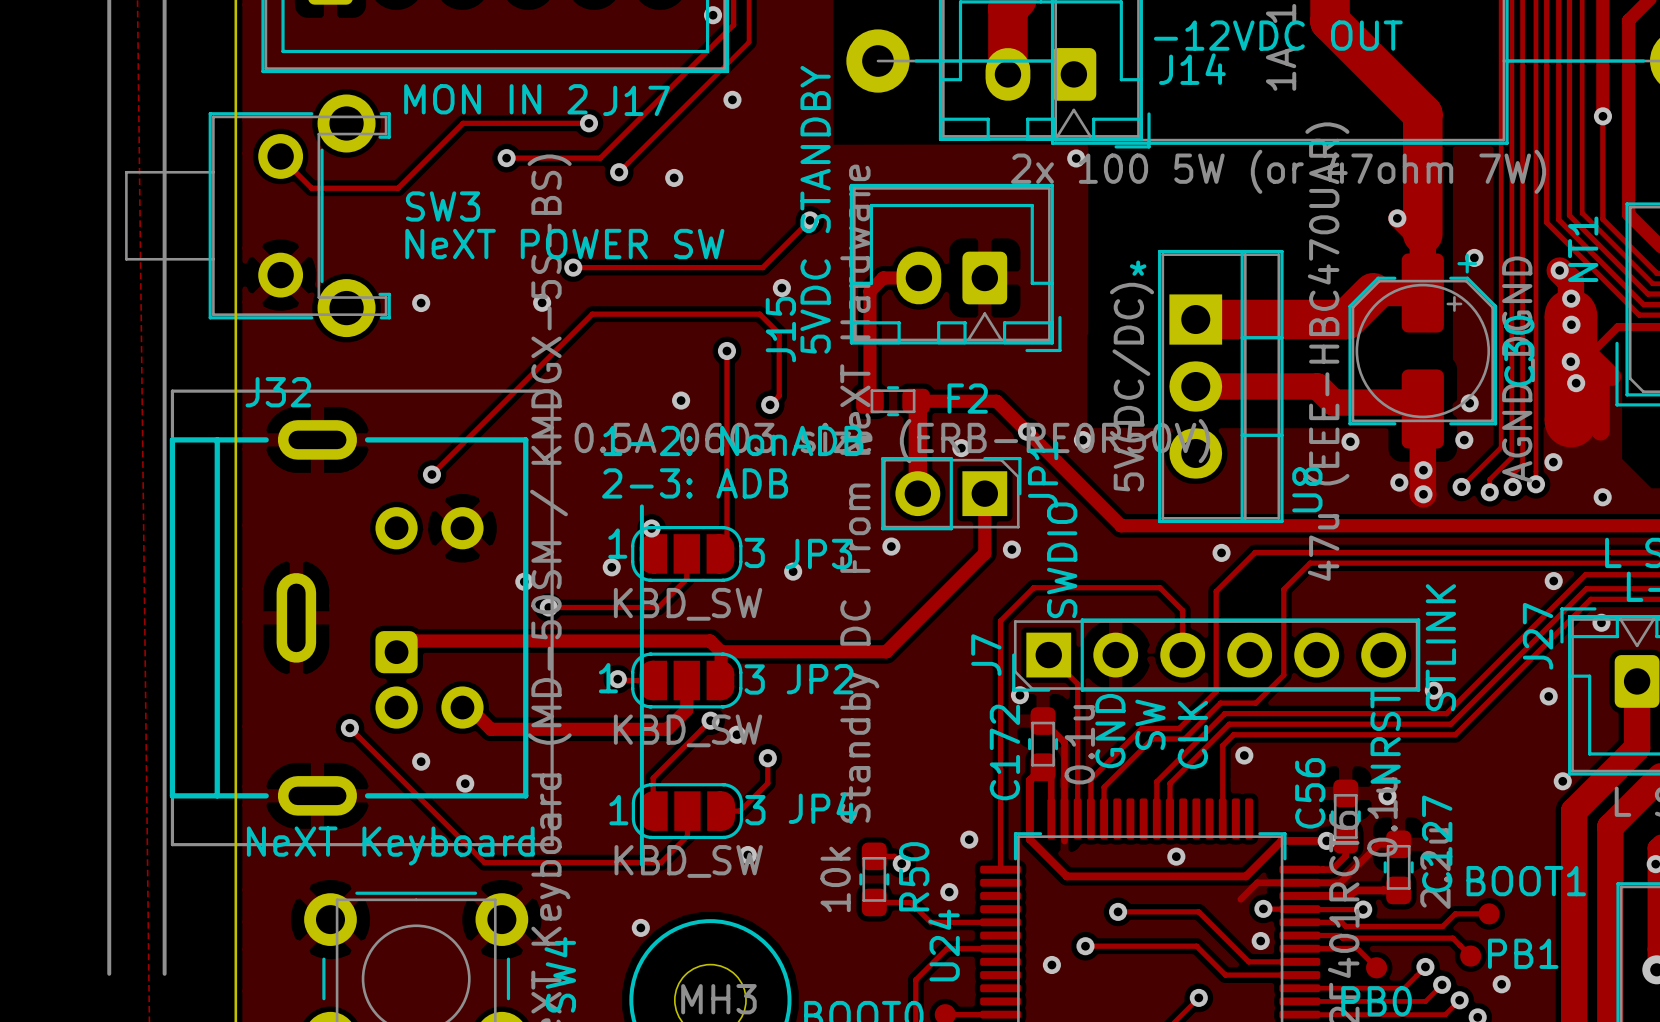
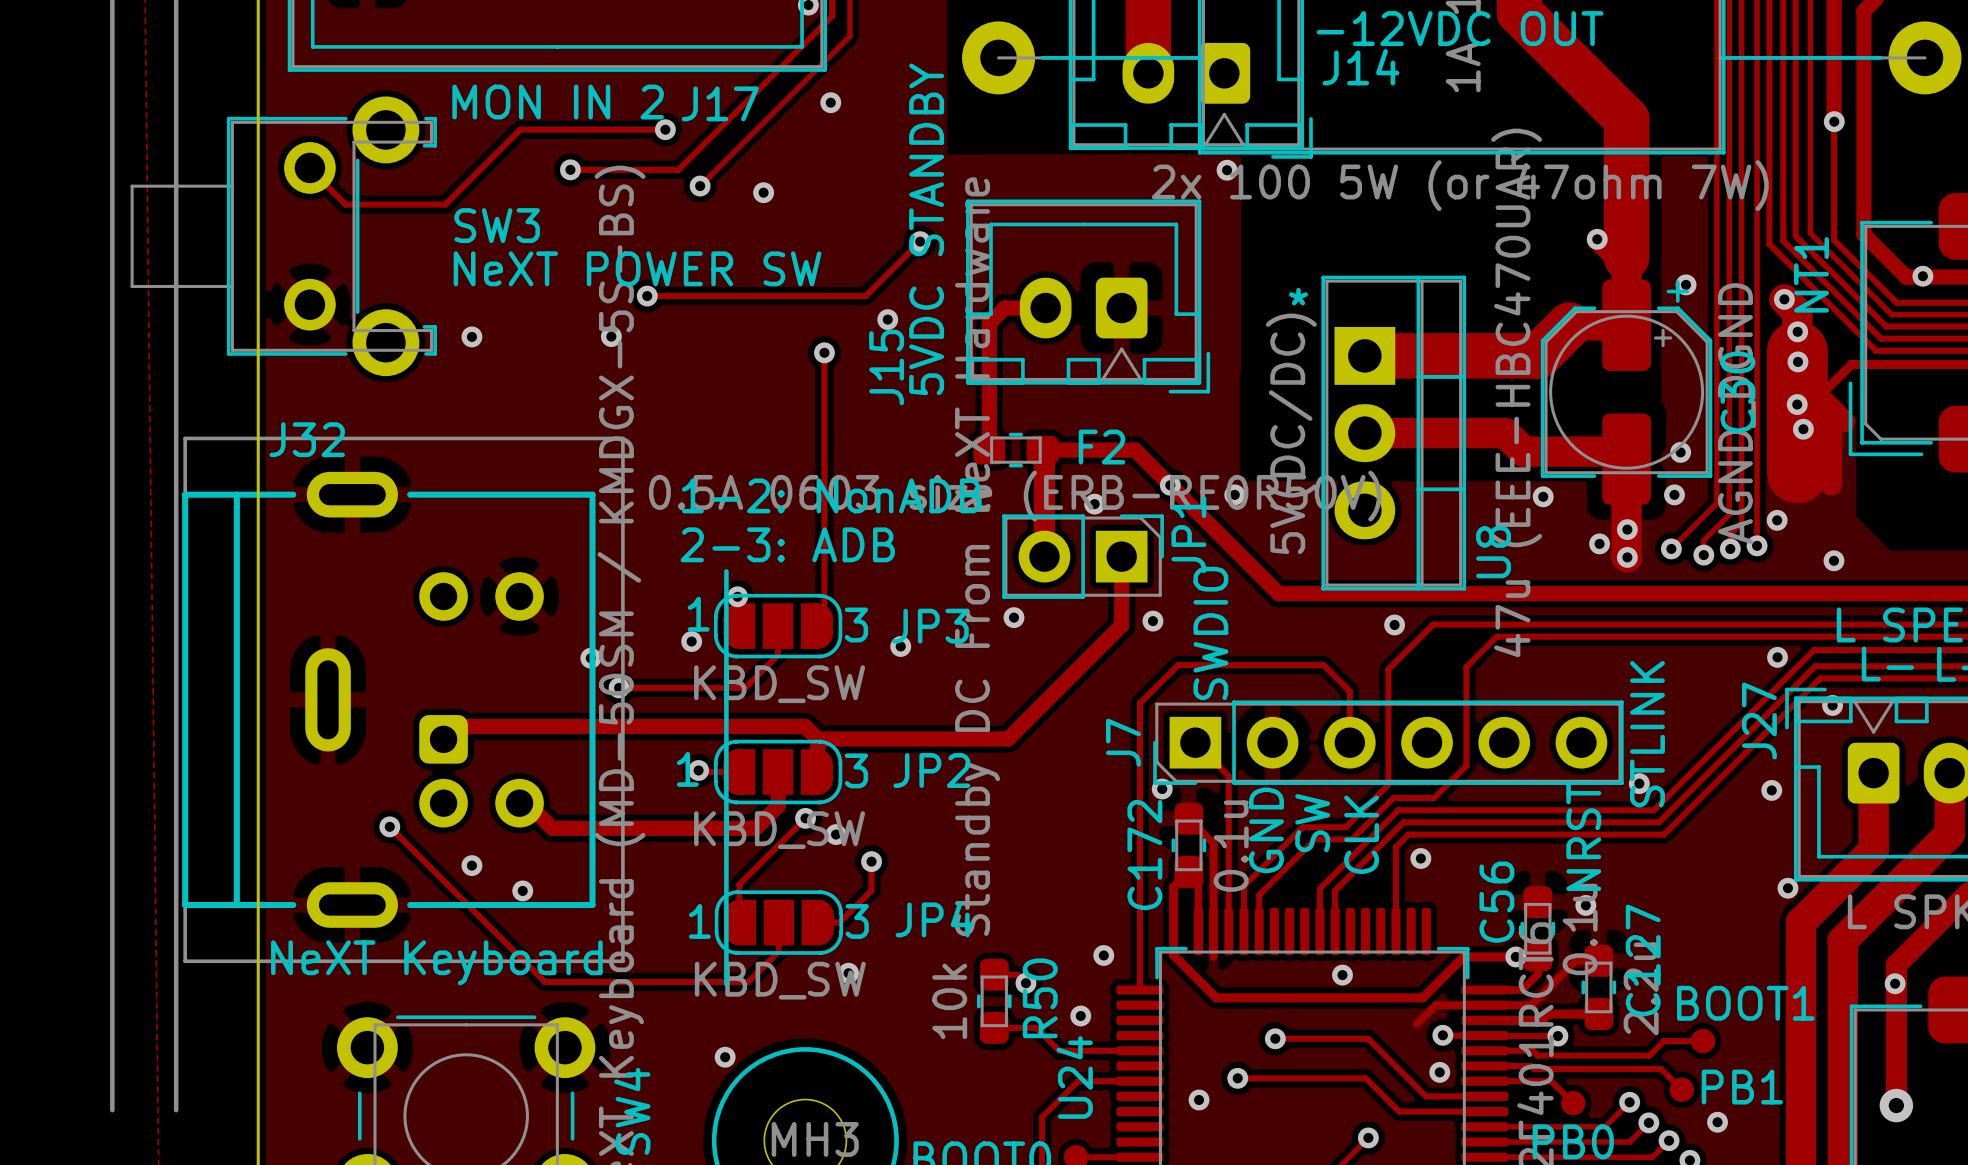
track: none -> (824, 352) (824, 392)
via position: (726, 351) -> (824, 352)
via: (681, 400) -> none
track: (770, 404) (779, 395) (779, 333) (759, 314) (592, 314) (431, 474) -> none
via: (770, 404) -> none
via: (431, 474) -> none

